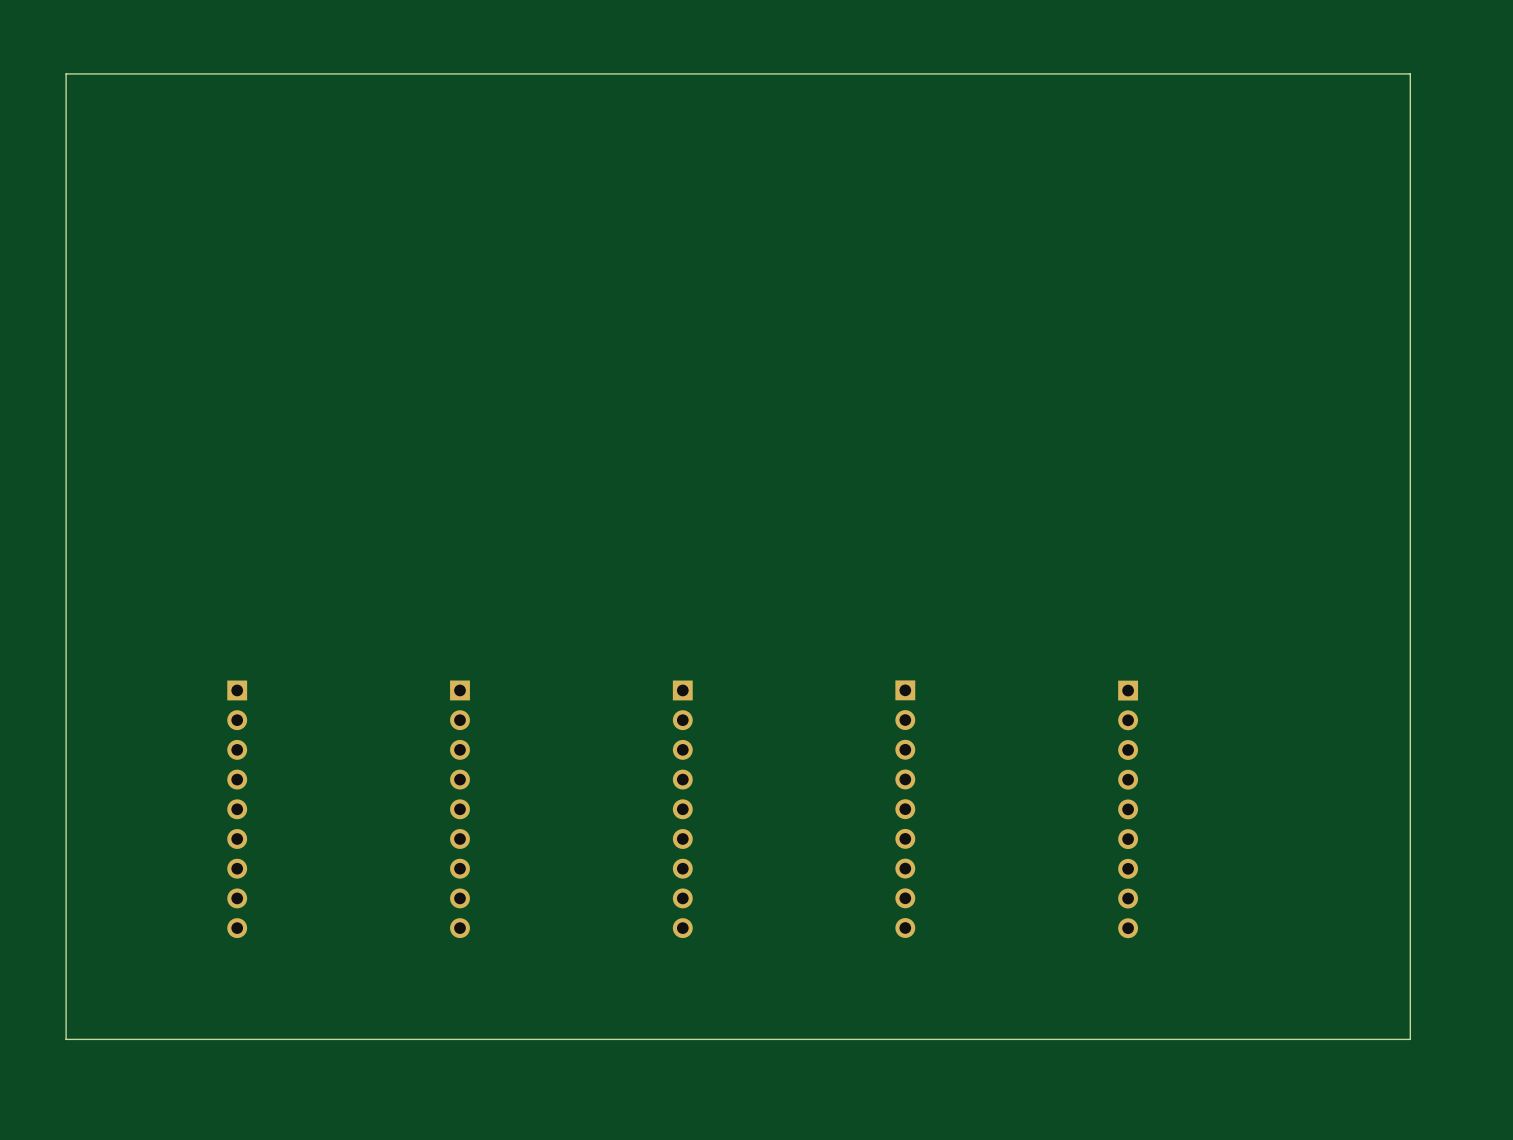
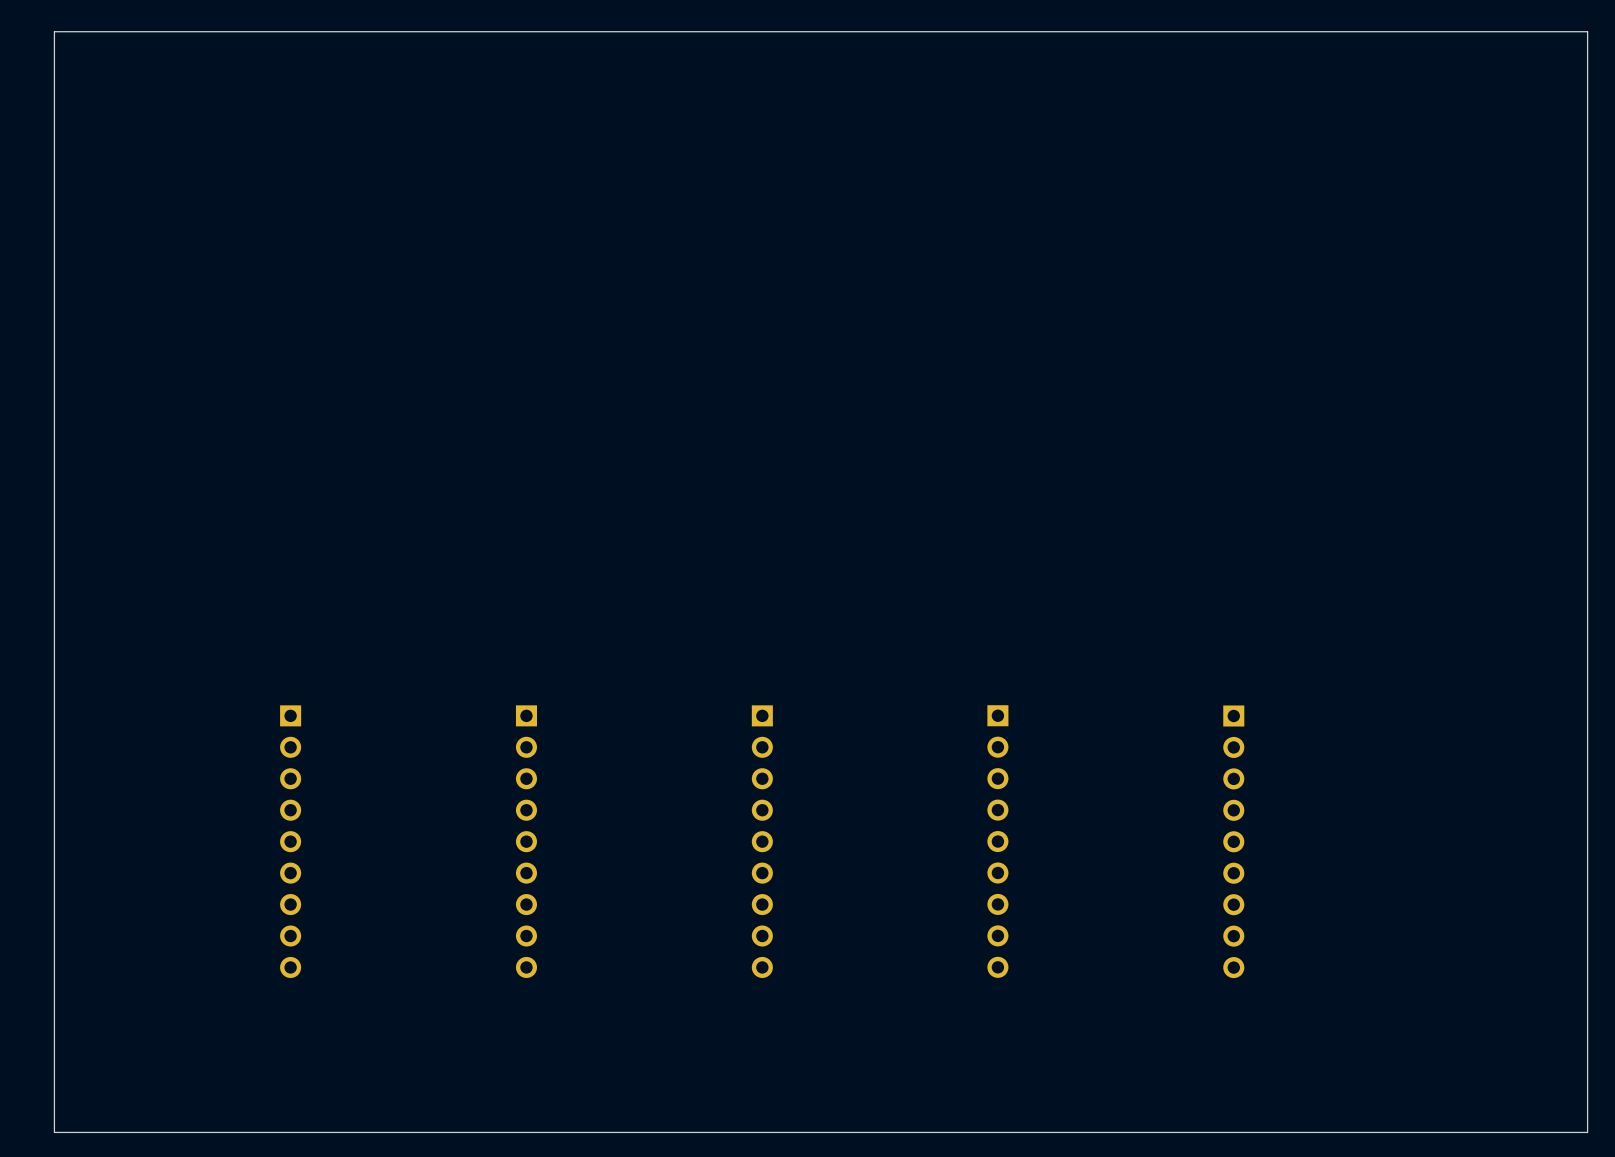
board edge: (1410, 73) (66, 73) (66, 1039) (1410, 1039) (1410, 73) -> (1587, 31) (1587, 1132) (54, 1132) (54, 31) (1587, 31)

